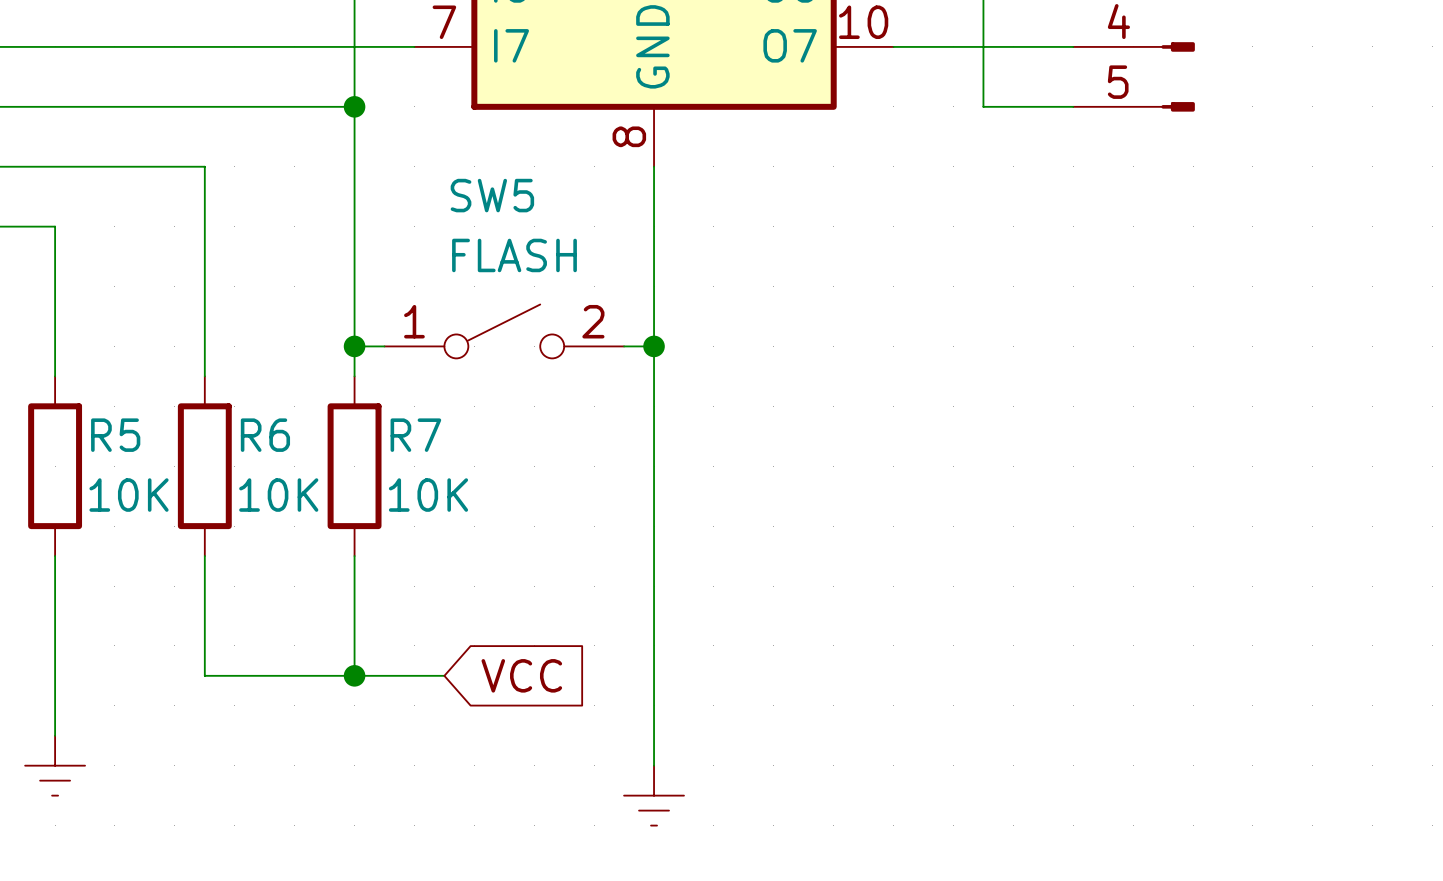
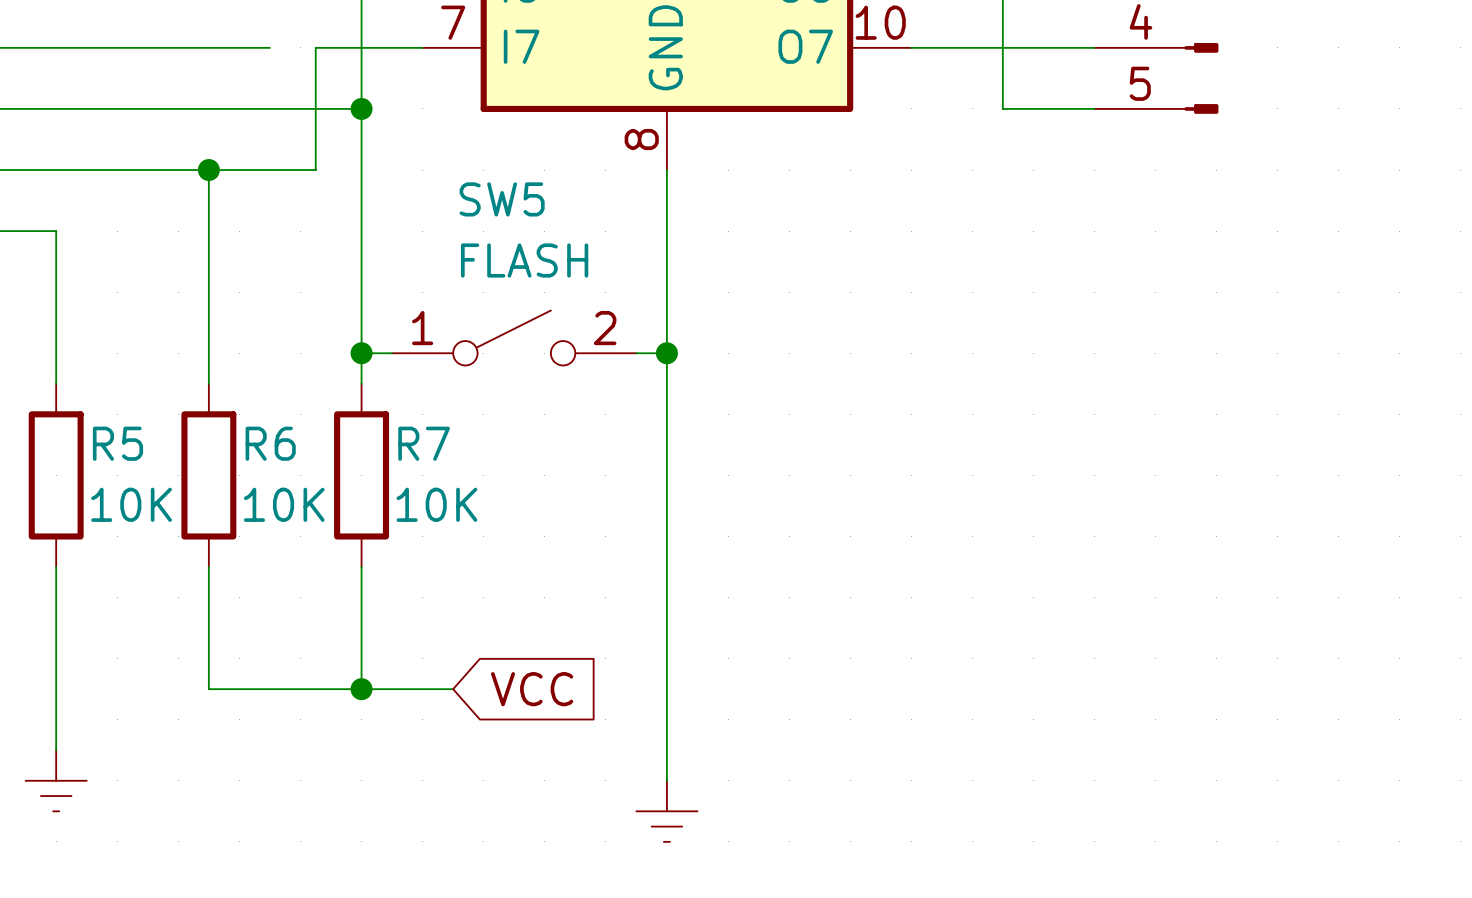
wire: (264, 46) (309, 46) -> (208, 170) (315, 170) (315, 47)
junction: none -> (208, 170)

